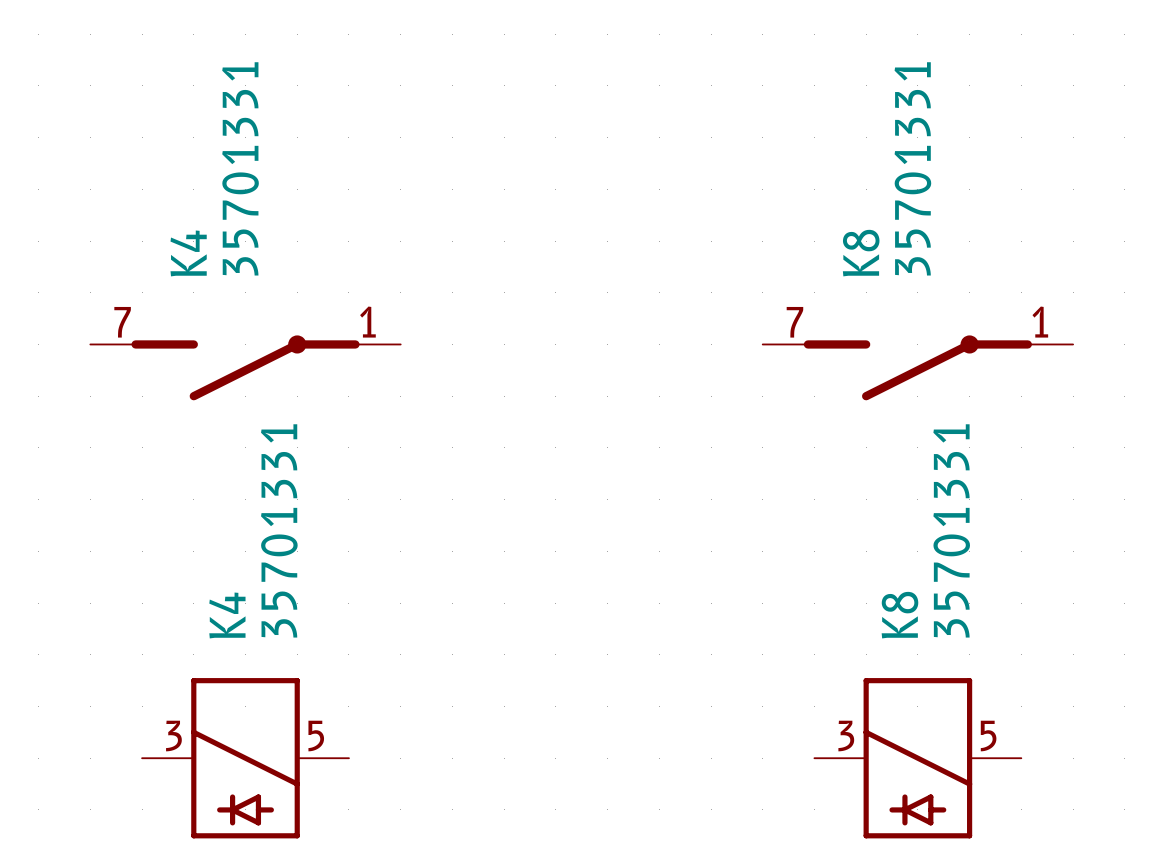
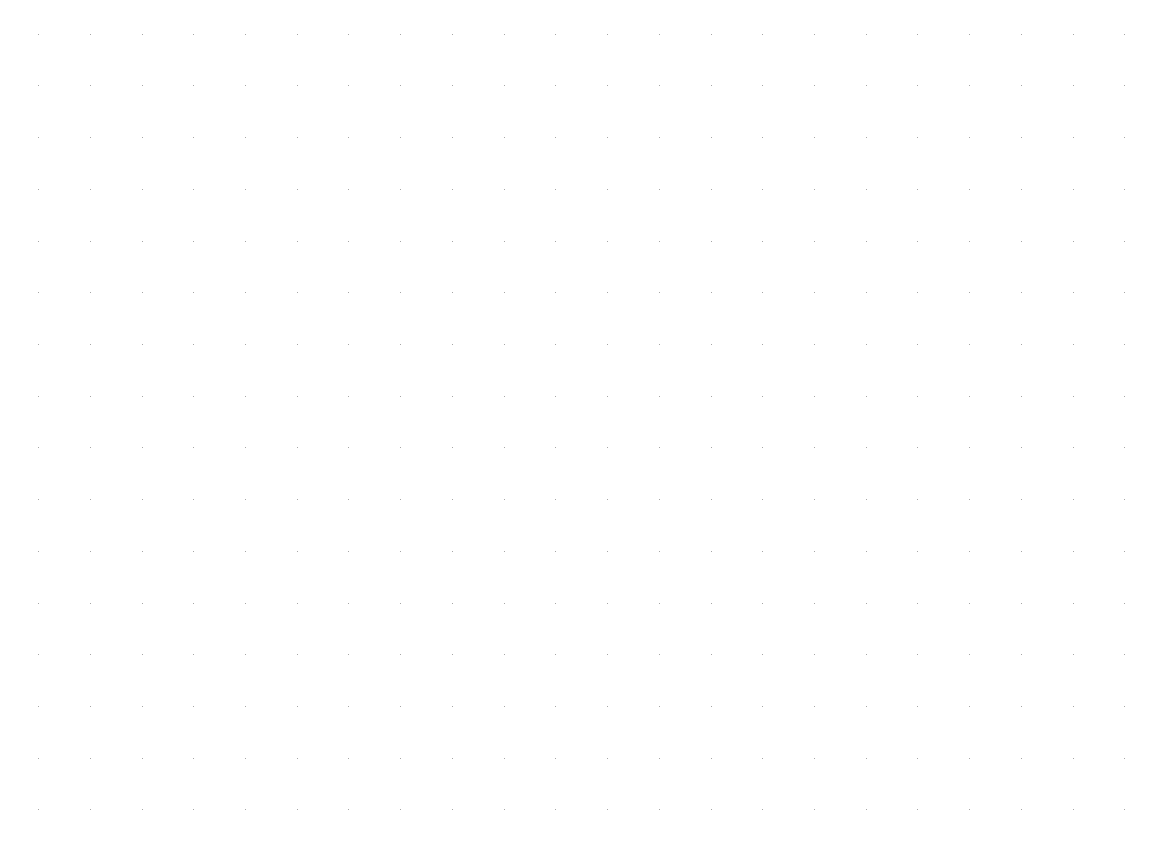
K4: 35701331 (245, 367) -> none
K8: 35701331 (917, 367) -> none
K4: 35701331 (245, 758) -> none
K8: 35701331 (917, 758) -> none

